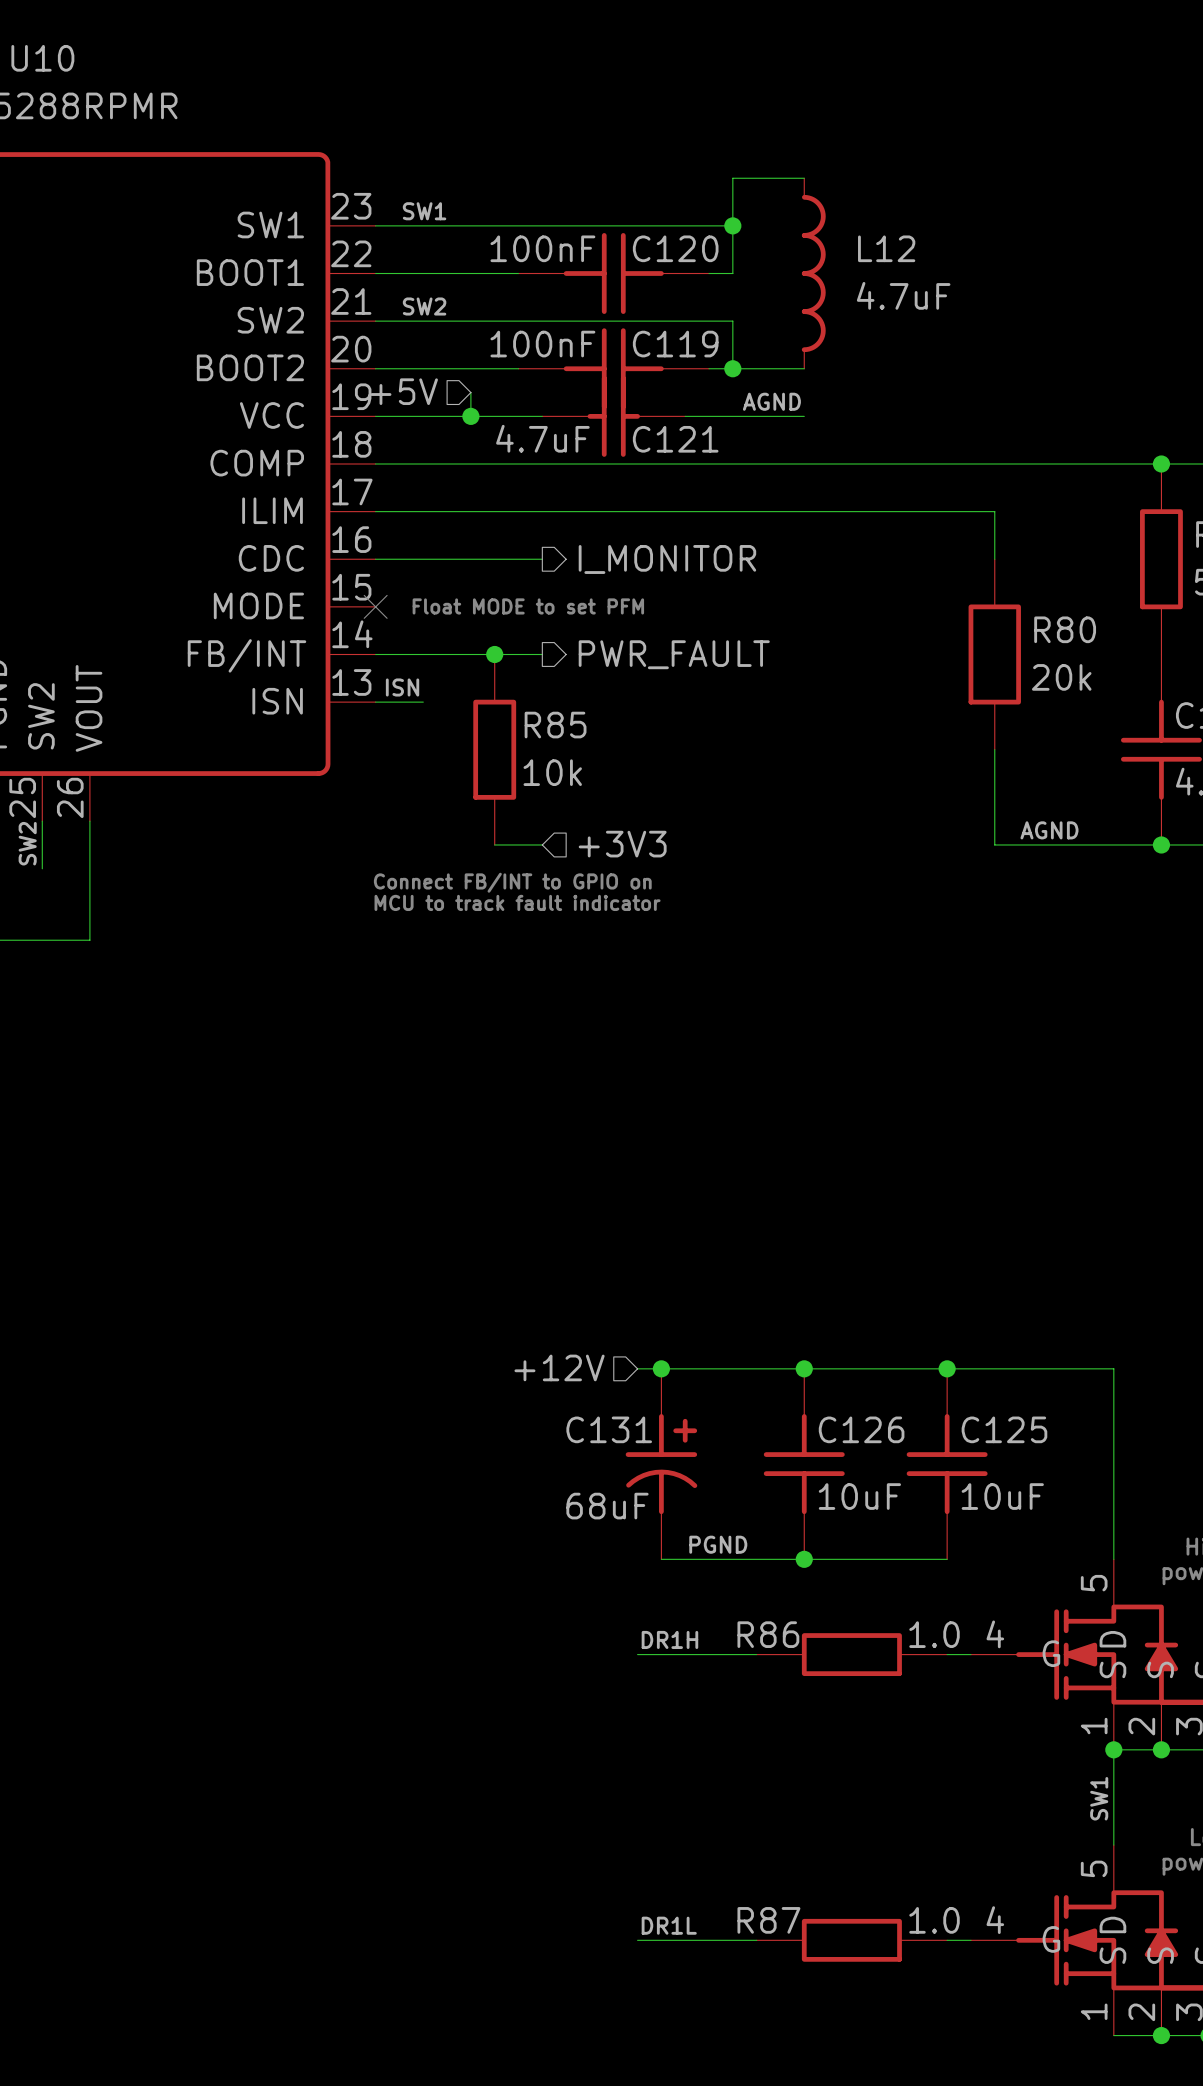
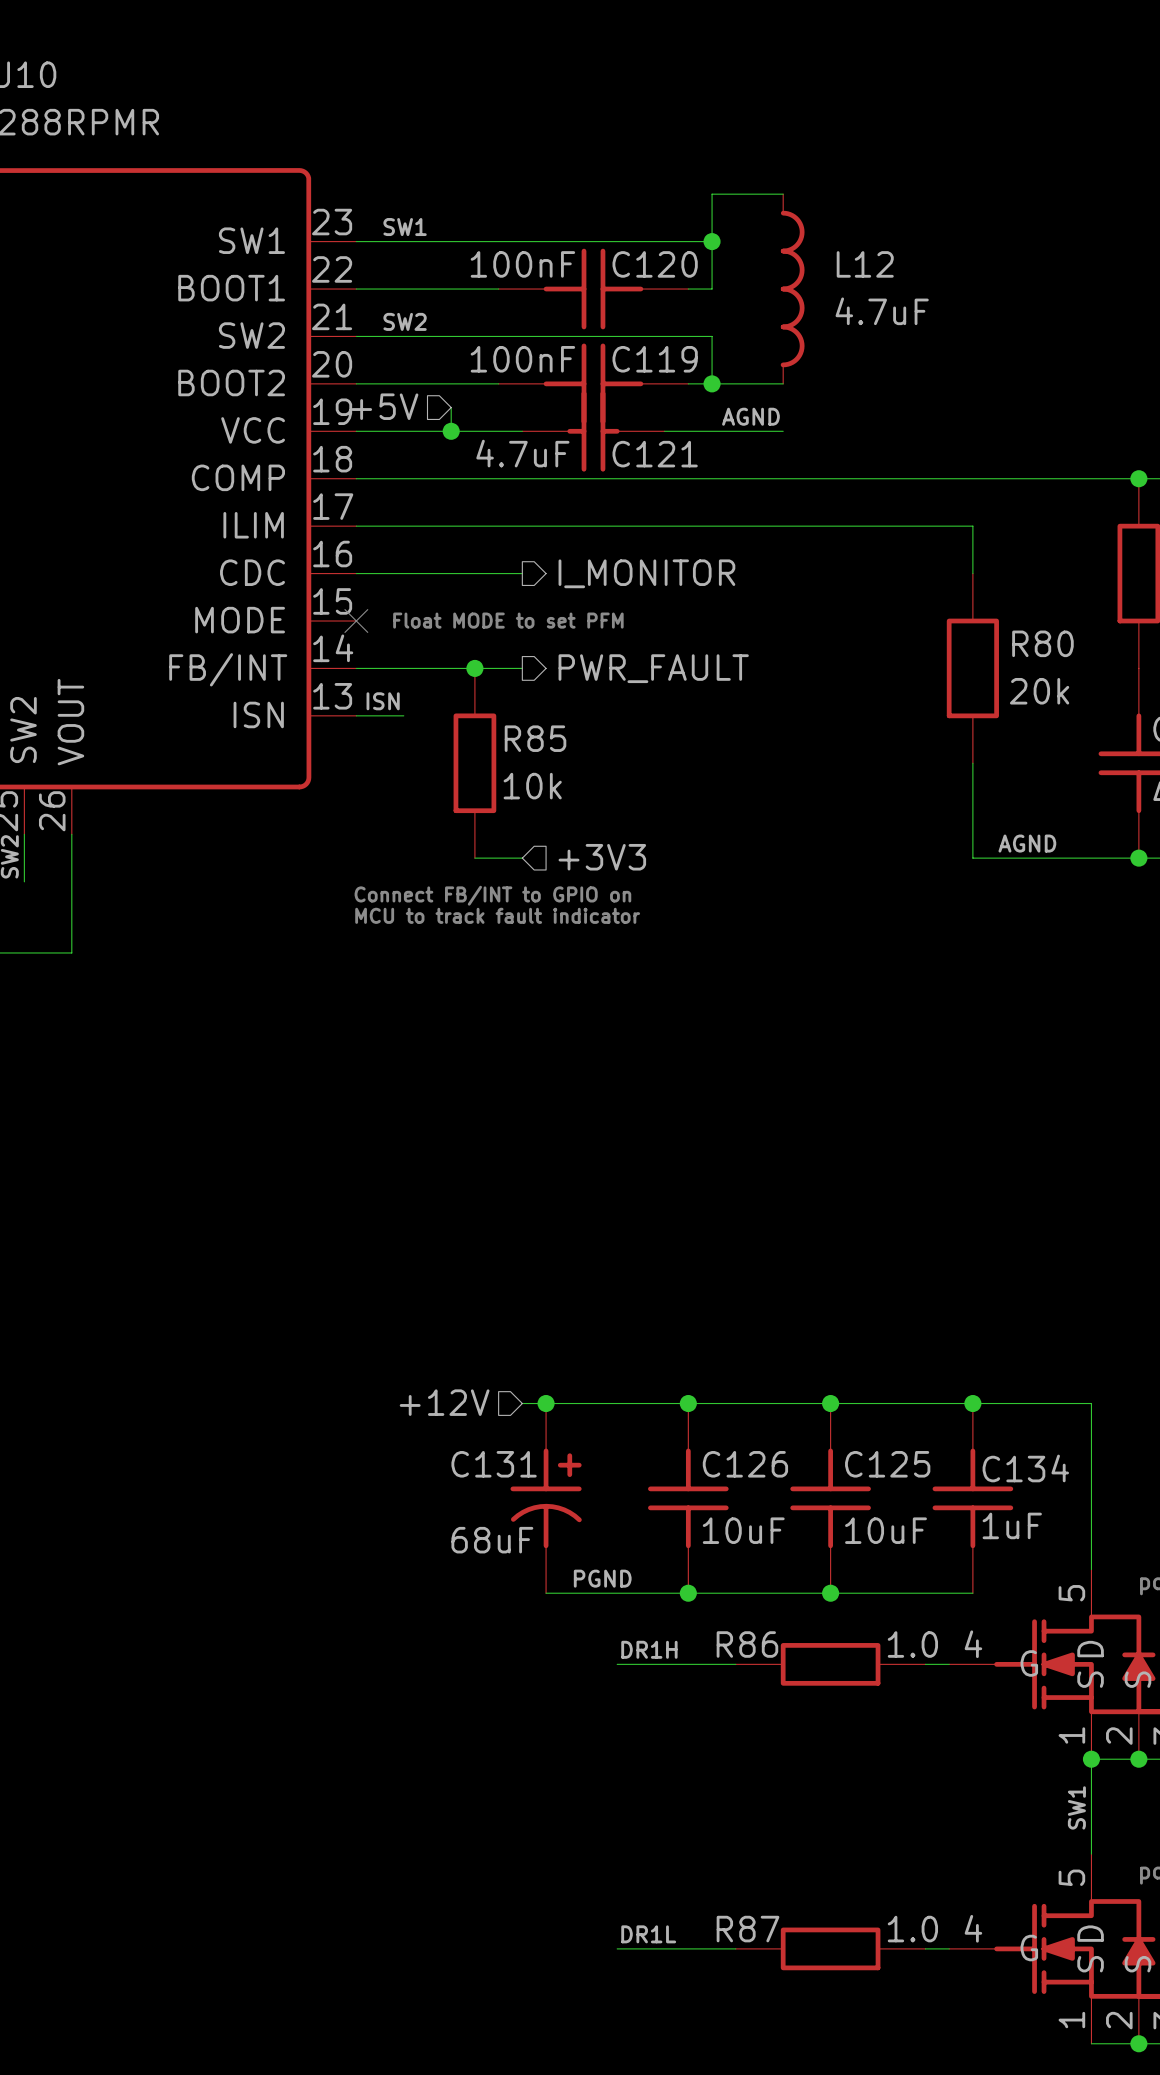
hierarchical label position: +12V (559, 1367) -> +12V (444, 1402)
wire: (637, 1368) (1113, 1368) (1113, 1392) -> (522, 1403) (1091, 1403)
junction: (661, 1368) -> none
junction: (804, 1368) -> none
junction: (947, 1368) -> none
junction: none -> (546, 1403)
junction: none -> (688, 1403)
junction: none -> (830, 1403)
junction: none -> (972, 1403)
C131 position: (661, 1464) -> (546, 1498)
C126 position: (804, 1464) -> (688, 1498)
C125 position: (947, 1464) -> (830, 1498)
C134: none -> 1uF (972, 1498)
label position: PGND (718, 1544) -> PGND (602, 1578)
wire: (661, 1559) (947, 1559) -> none
junction: (804, 1559) -> none
wire: none -> (546, 1593) (972, 1593)
junction: none -> (688, 1593)
junction: none -> (830, 1593)

